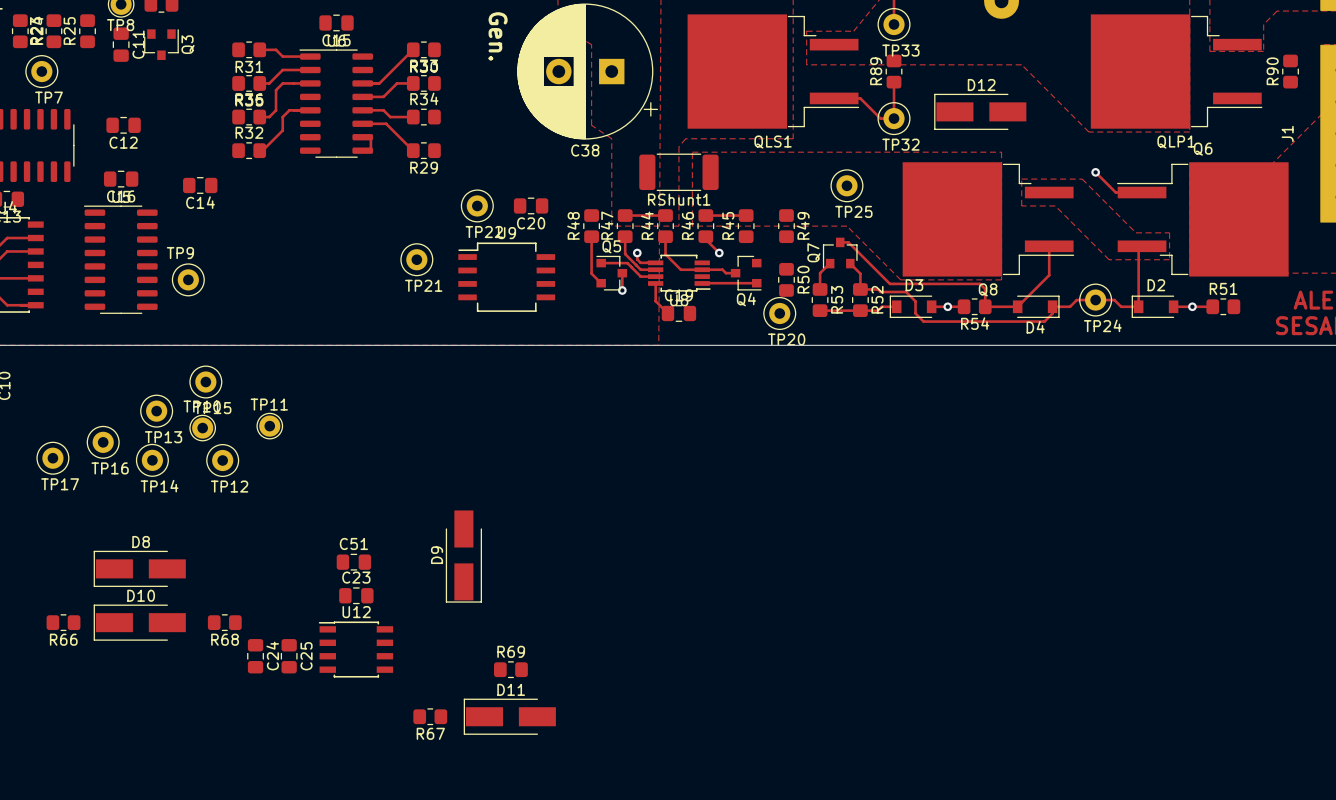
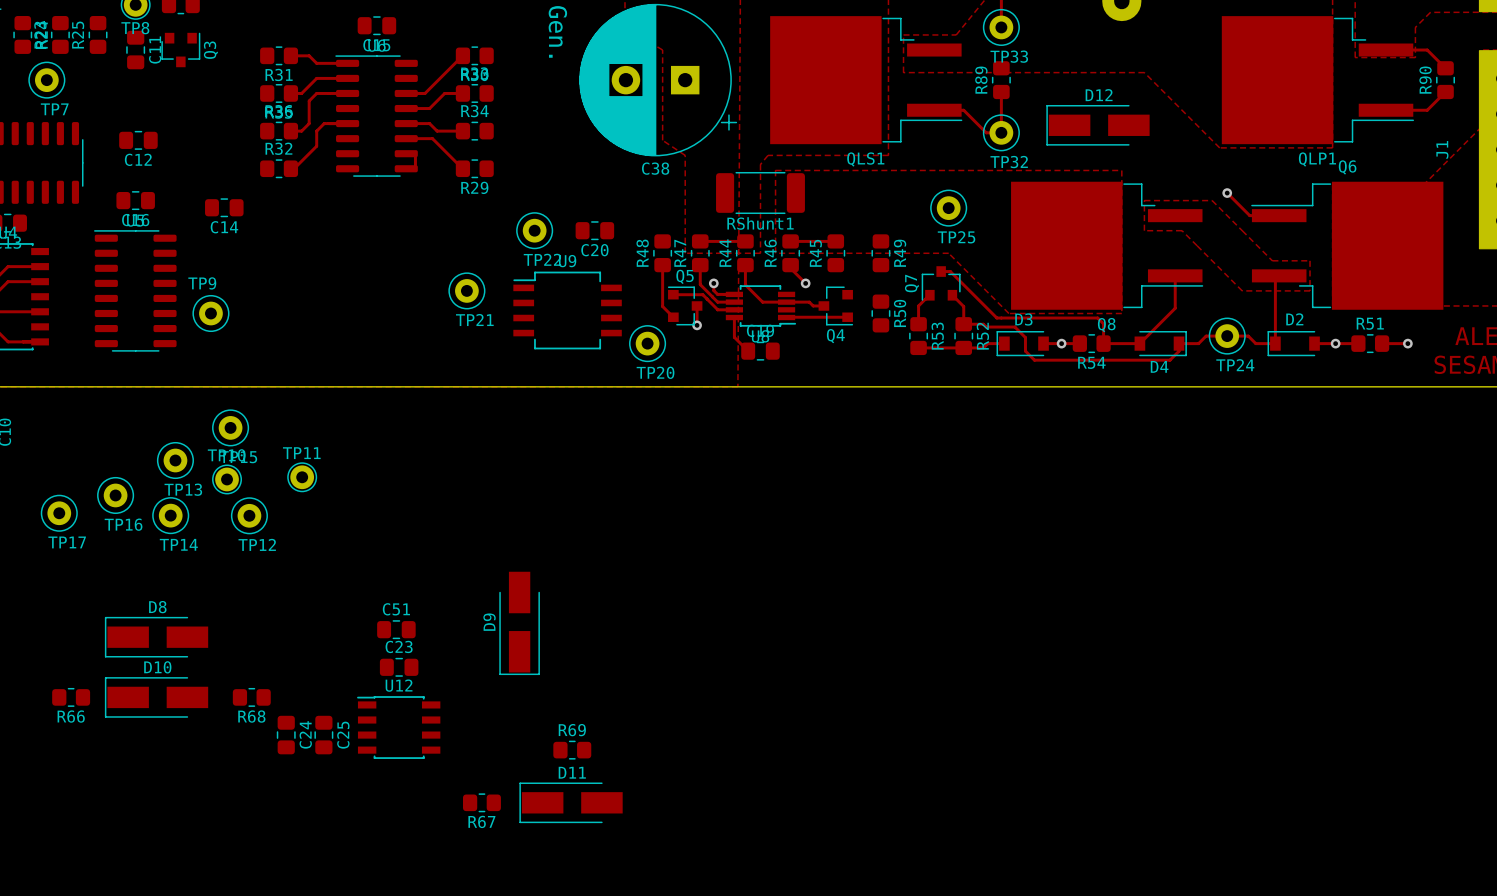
track: none -> (1386, 50) (1427, 50) (1445, 68)
track: none -> (1445, 91) (1427, 110) (1386, 110)
track: none -> (1382, 343) (1407, 343)
via: none -> (1407, 343)
TP20 position: (779, 313) -> (647, 343)

